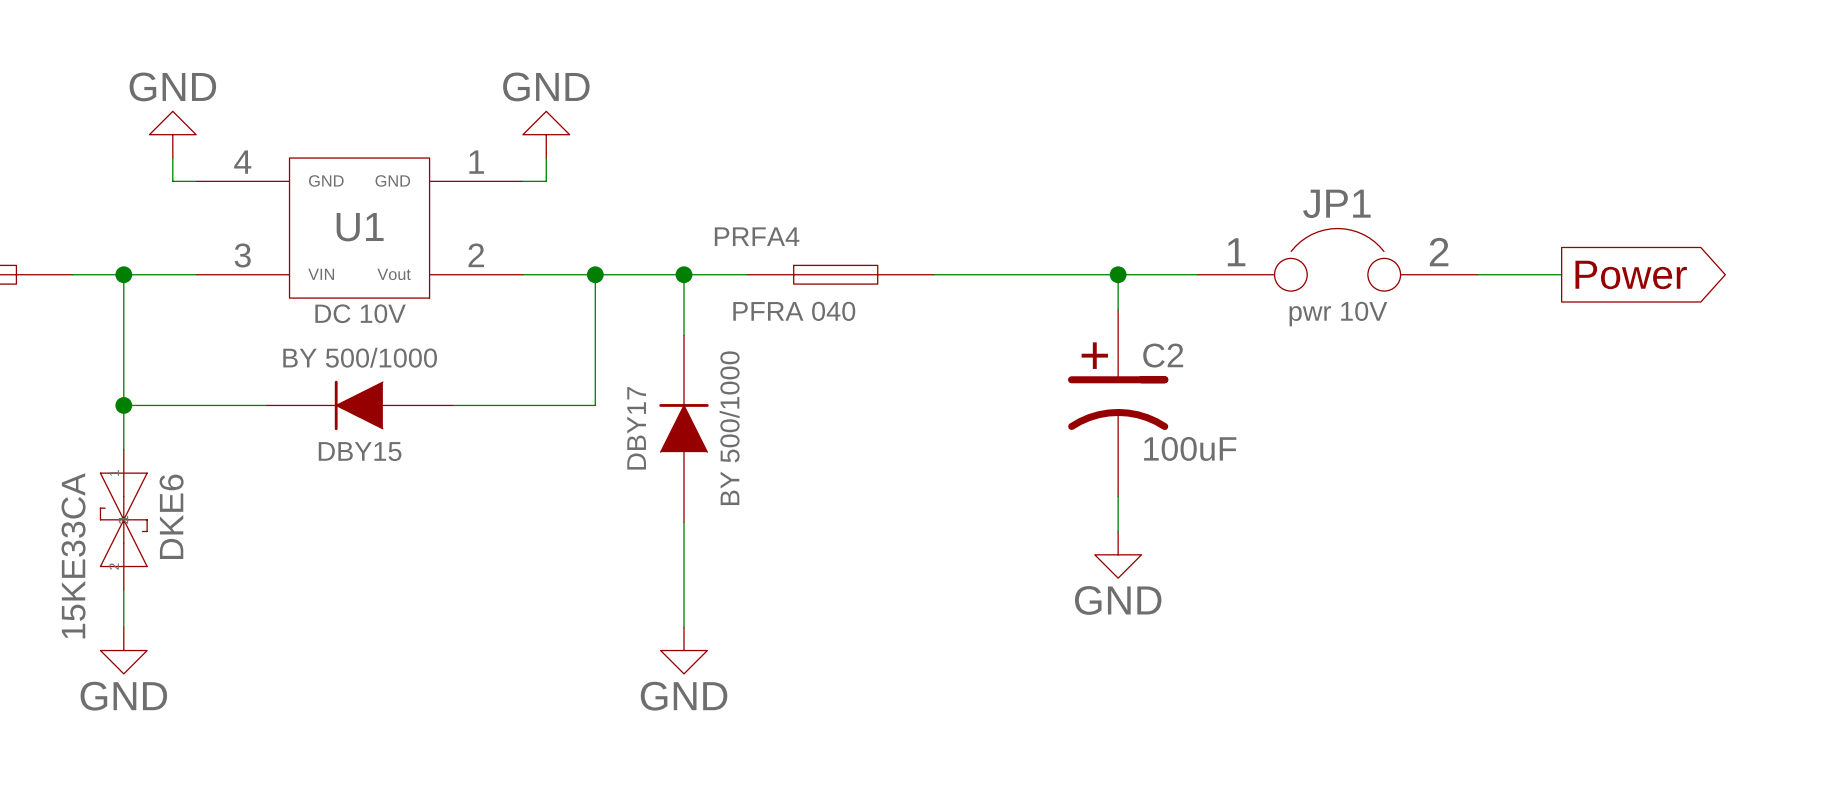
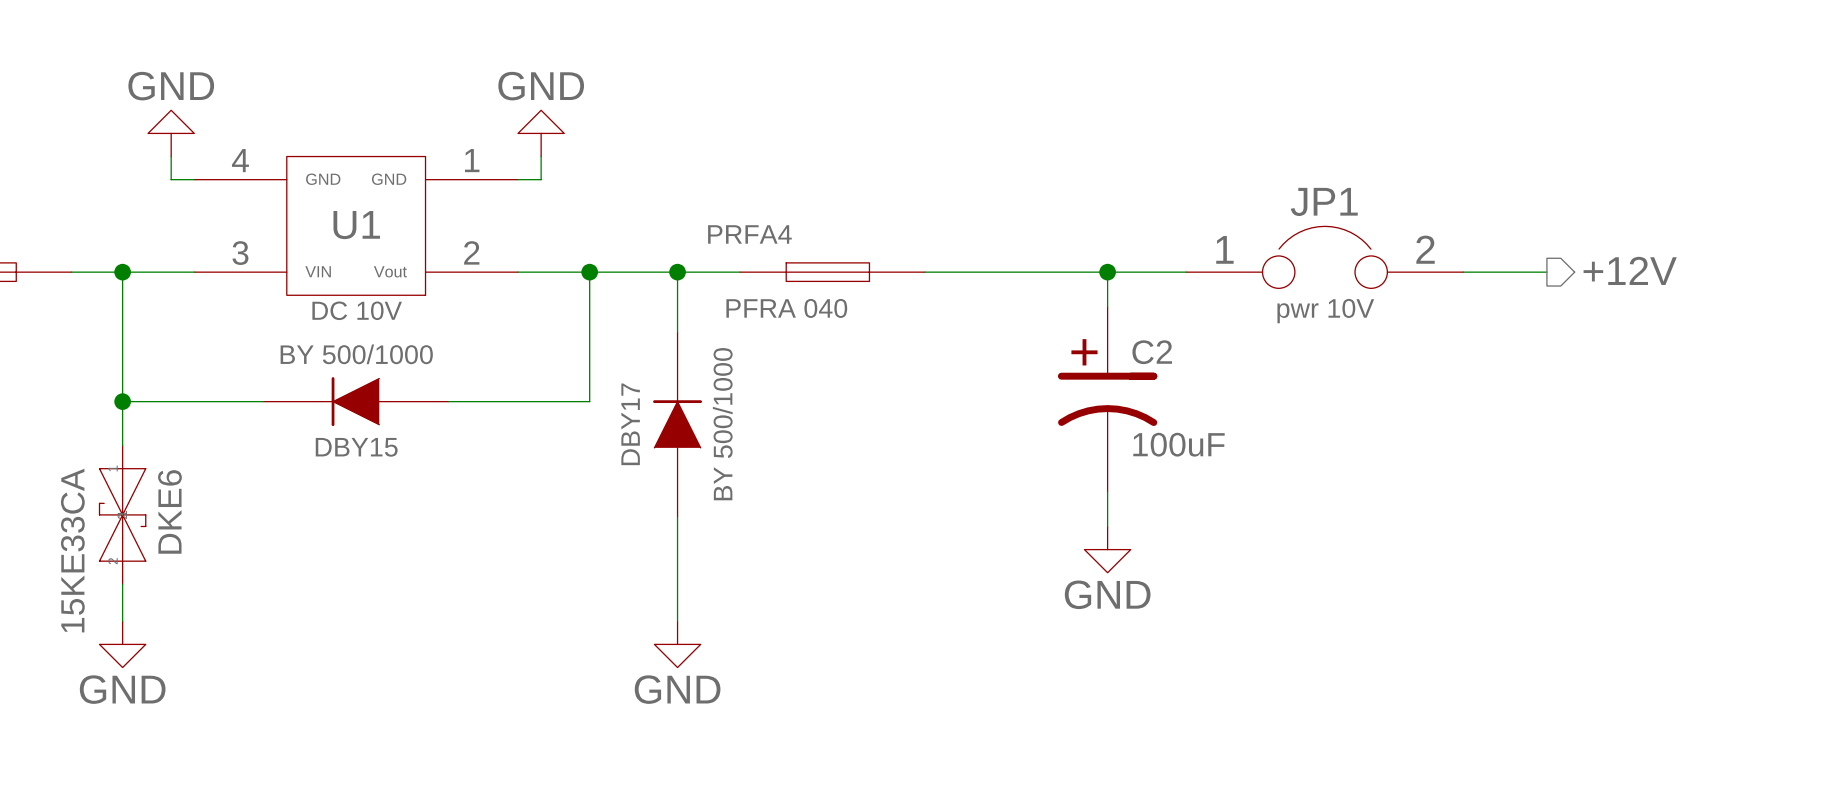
hierarchical label: none -> +12V (1630, 270)
global label: Power (1631, 274) -> none

